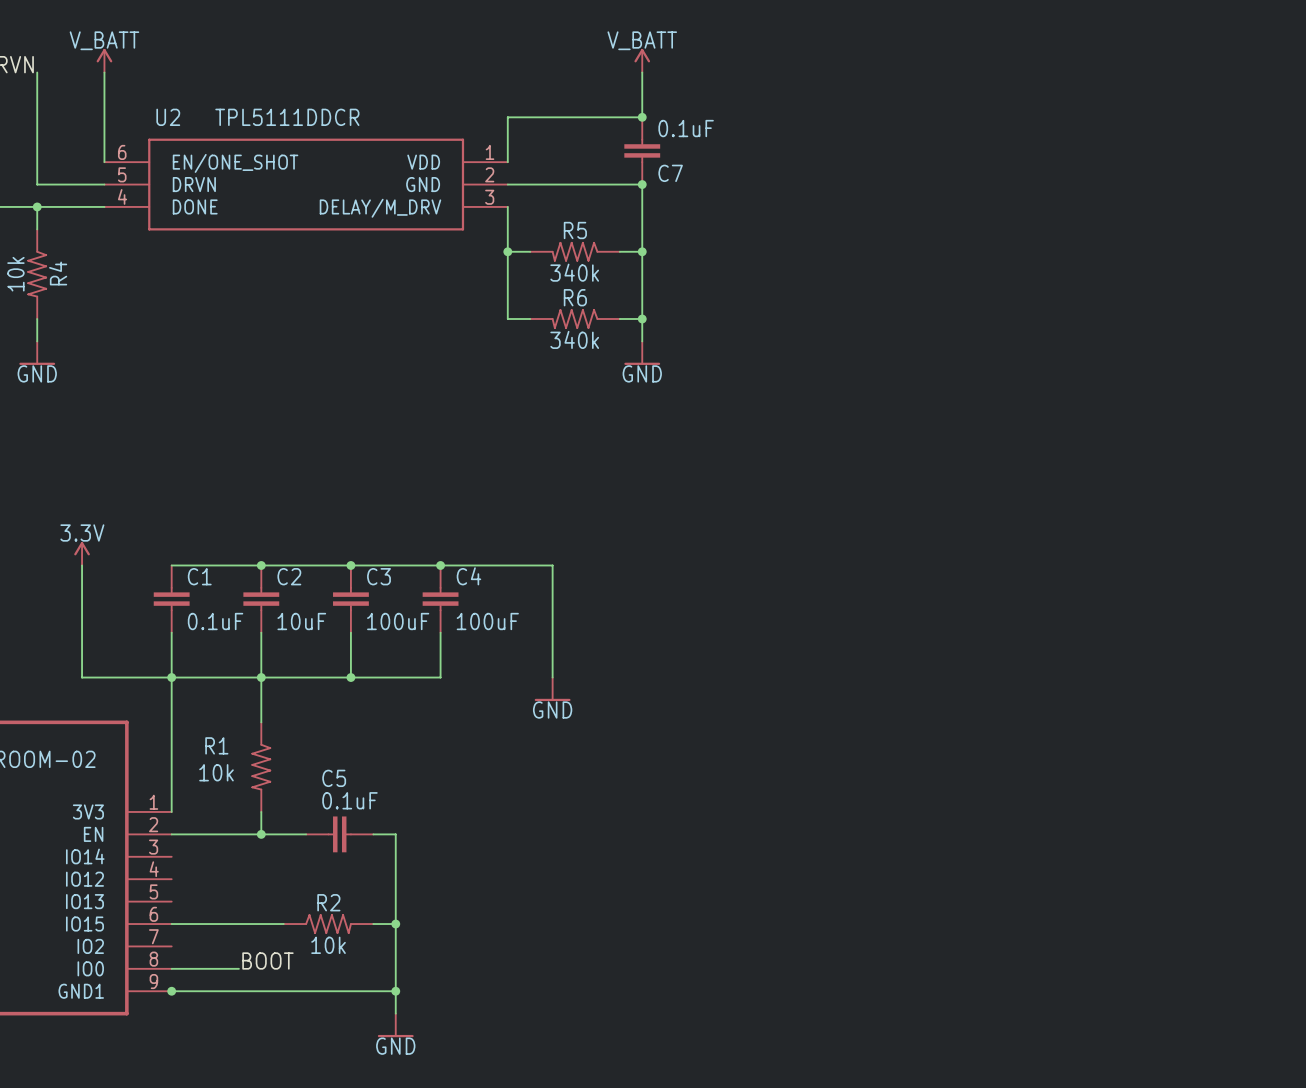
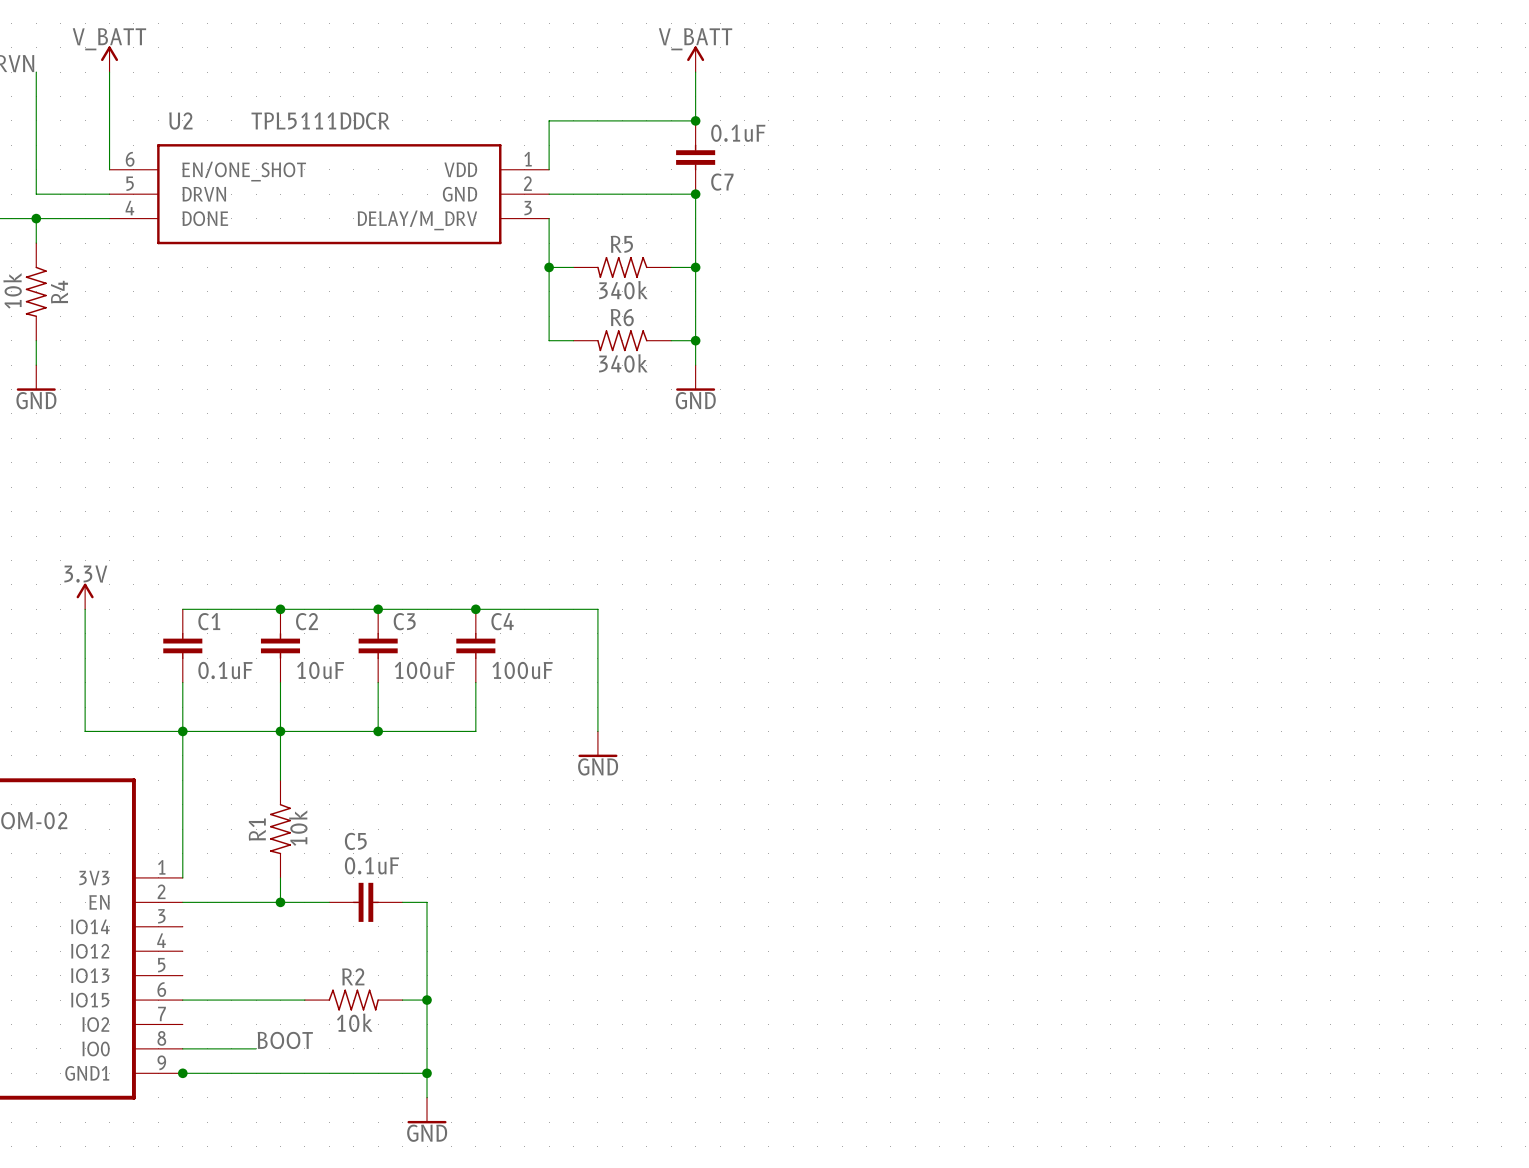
R1 name rotation: 0° (216, 745) -> 90° counterclockwise (257, 829)
R1 value rotation: 0° (216, 772) -> 90° counterclockwise (298, 828)
R1 value position: 10k (216, 772) -> 10k (298, 828)

